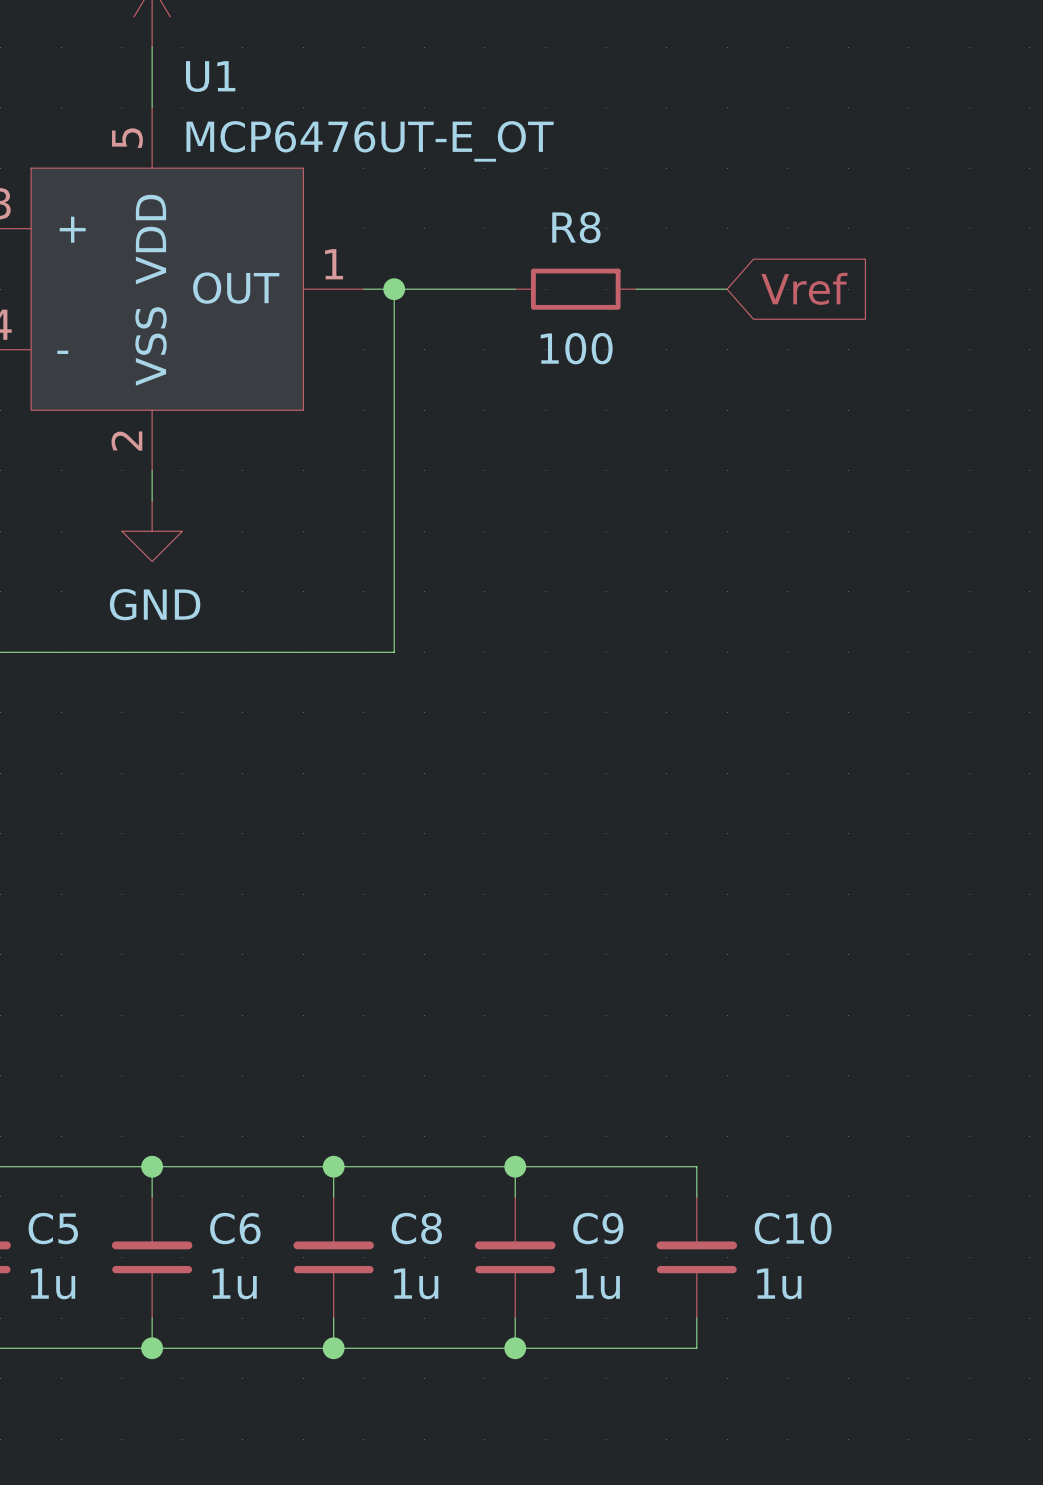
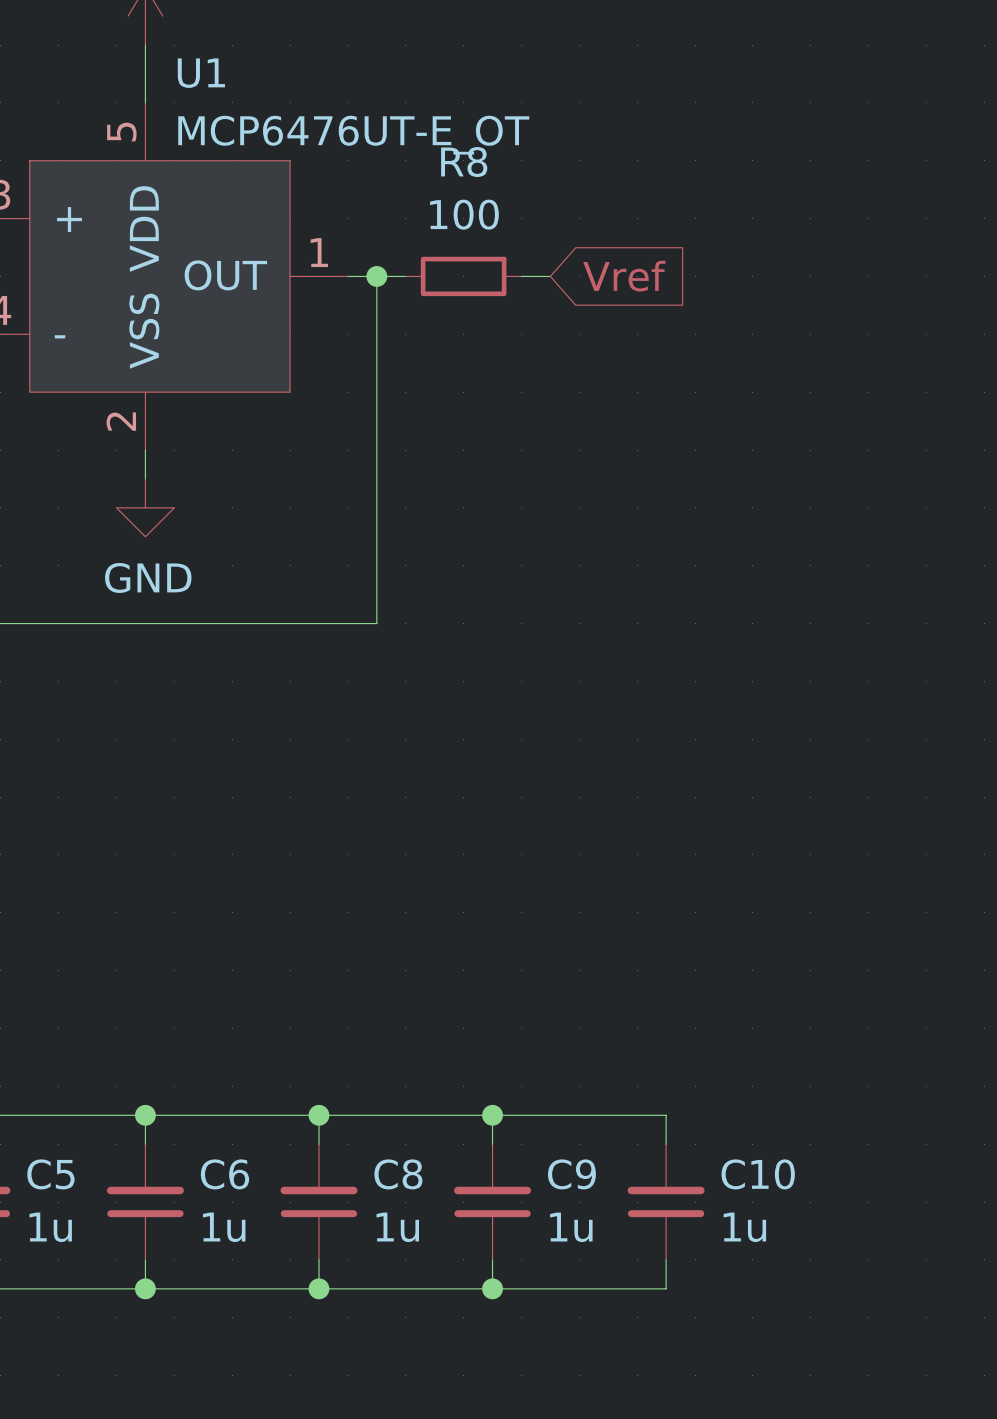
R8 name position: R8 (576, 227) -> R8 (464, 162)
global label position: Vref (804, 288) -> Vref (624, 276)
wire: (424, 289) (515, 289) -> none
wire: none -> (521, 276) (550, 276)
R8 position: (575, 289) -> (463, 276)
wire: (636, 289) (727, 289) -> none
R8 value position: 100 (576, 348) -> 100 (464, 214)

